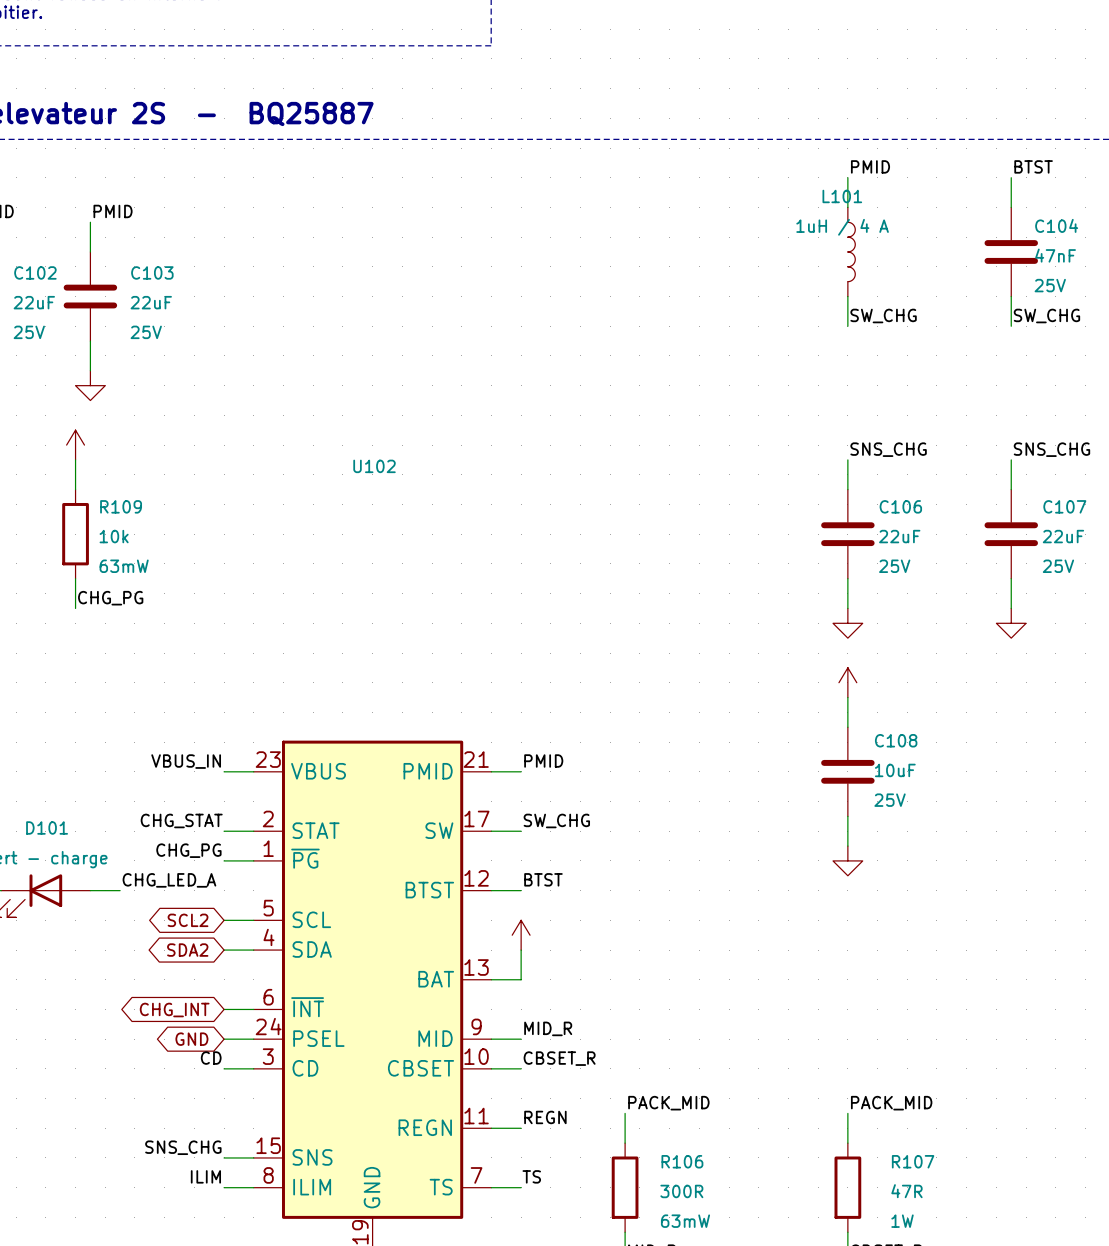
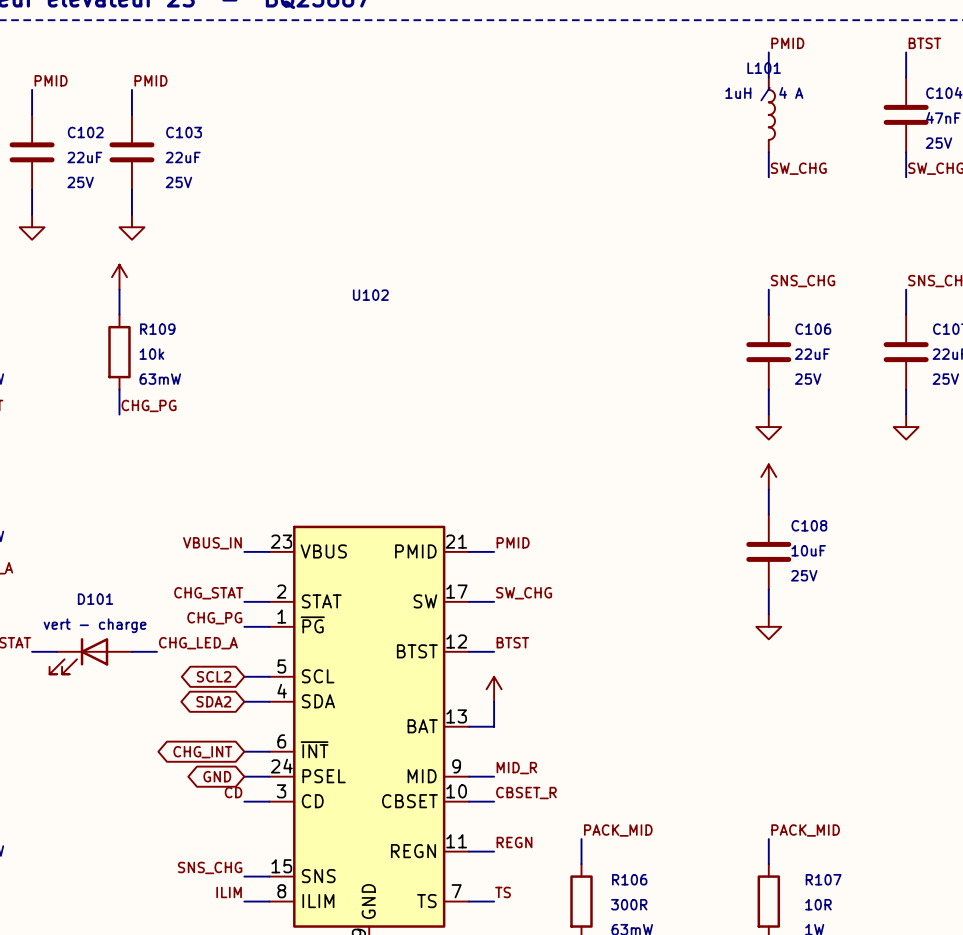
R107 value: 47R (906, 1191) -> 10R (818, 904)

